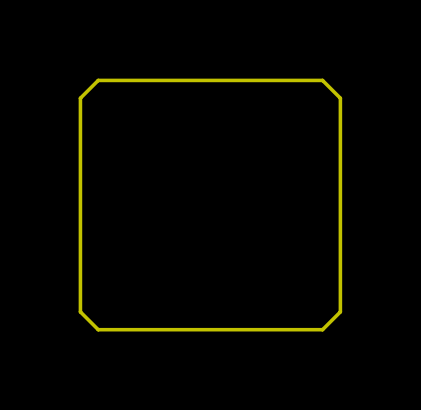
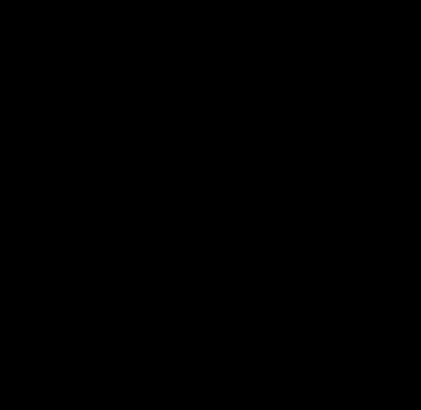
board edge: (98, 80) (80, 98) (80, 311) (98, 329) (322, 329) (340, 311) (340, 98) (322, 80) (98, 80) -> none

